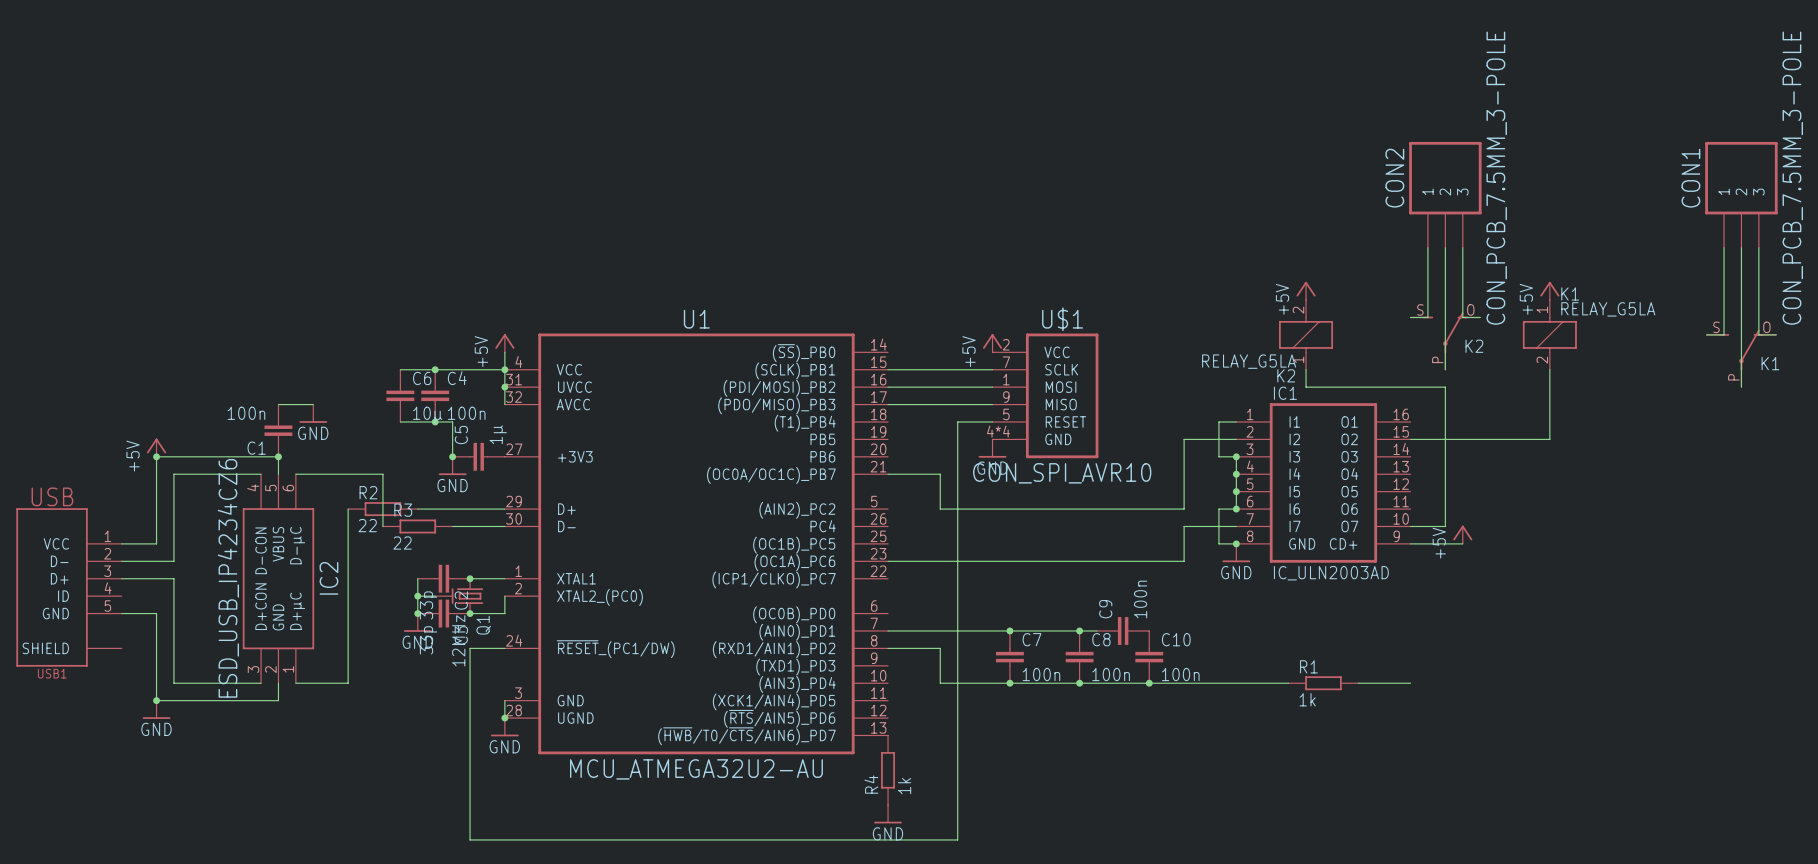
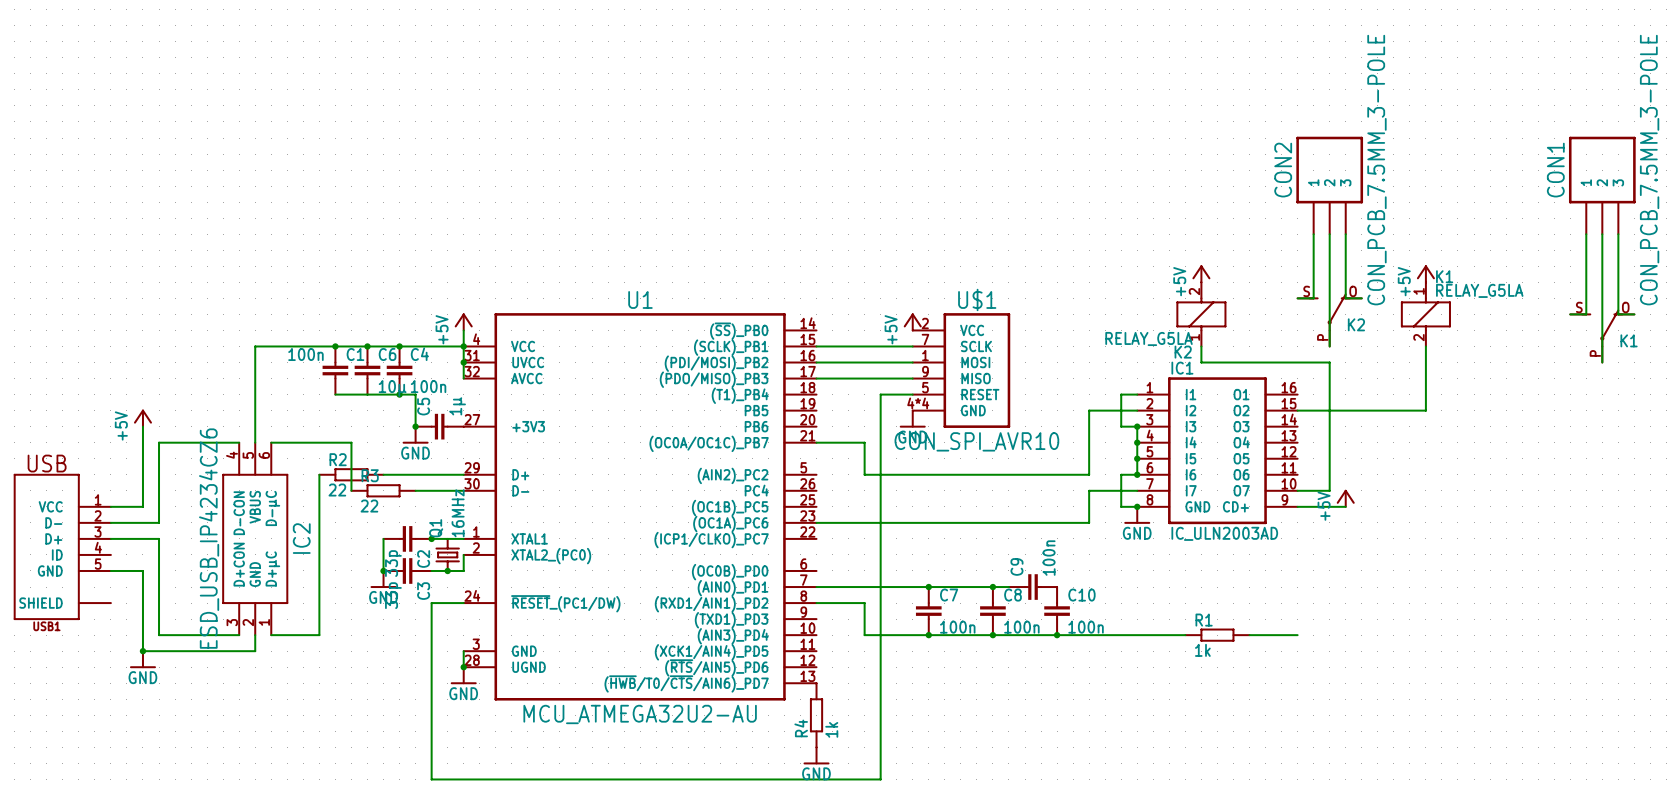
junction: none -> (335, 346)
junction: none -> (367, 346)
wire: (278, 404) (313, 404) -> (335, 394) (367, 394)
power symbol: GND (313, 413) -> none
C1 position: (278, 430) -> (335, 370)
C1 name position: C1 (256, 448) -> C1 (355, 354)
wire: (156, 456) (278, 456) -> (367, 346) (255, 346) (255, 426)
junction: (156, 456) -> none
junction: (278, 456) -> none
Q1 symbol: [435, 578, 484, 615] -> [435, 538, 460, 572]
wire: (417, 596) (435, 596) -> none
junction: (417, 596) -> none
junction position: (470, 613) -> (447, 570)
Q1 name position: Q1 (483, 625) -> Q1 (436, 528)
Q1 value: 12MHz (458, 640) -> 16MHz (458, 513)

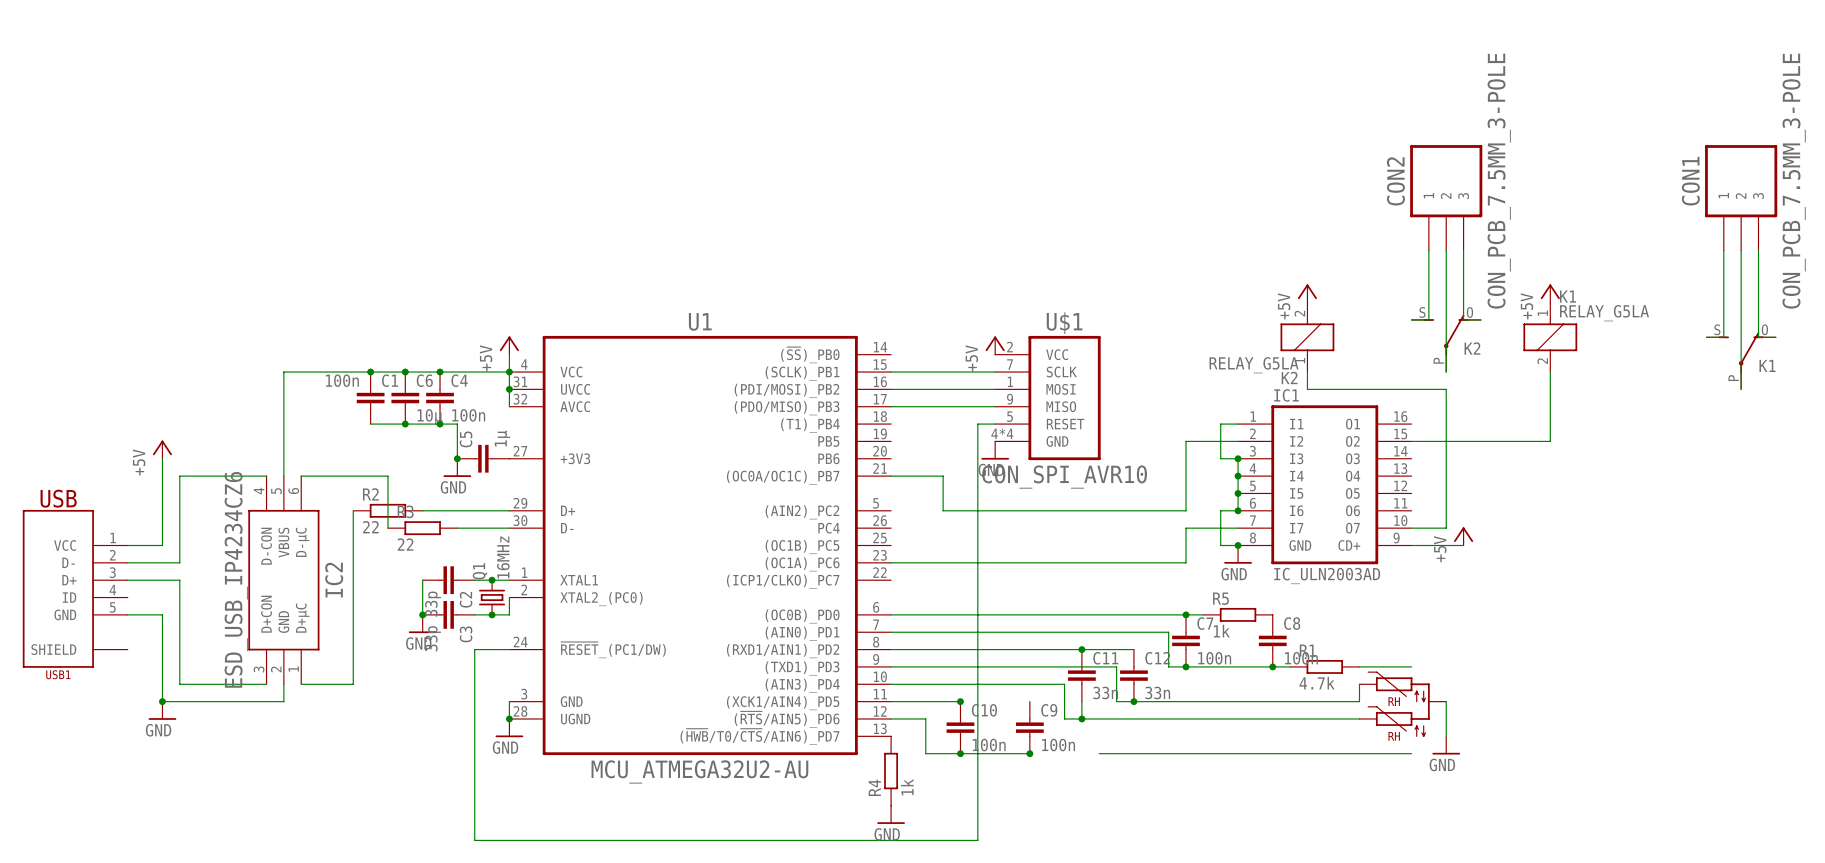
junction: none -> (405, 424)
wire: (896, 394) (880, 394) (880, 779) -> (977, 424) (977, 840) (960, 840)
junction position: (431, 538) -> (492, 580)
wire: none -> (891, 614) (1203, 614)
junction: none -> (1186, 614)
R5: none -> 1k (1238, 614)
junction: (928, 587) -> none
junction: (992, 587) -> none
wire: none -> (1099, 632) (1168, 632) (1168, 666) (1290, 666)
C9 rotation: 0° (1033, 587) -> 90° clockwise (1029, 727)
C9 position: (1033, 587) -> (1029, 727)
wire: (864, 603) (864, 635) -> (891, 684) (943, 684)
wire: none -> (943, 649) (1133, 649)
junction: none -> (1081, 649)
C7 position: (928, 611) -> (1186, 640)
C8 position: (992, 611) -> (1272, 640)
C10 position: (1057, 611) -> (960, 727)
junction: none -> (1186, 666)
junction: none -> (1272, 666)
wire: none -> (1359, 666) (1411, 666)
C11: none -> 33n (1081, 675)
C12: none -> 33n (1133, 675)
junction: (928, 635) -> none
wire: (976, 635) (1185, 635) -> (1064, 684) (1064, 718) (1359, 718)
junction: (992, 635) -> none
junction: (1057, 635) -> none
R1 position: (1217, 635) -> (1324, 666)
wire: (1249, 635) (1297, 635) -> (1359, 684) (1359, 701) (1116, 701) (1116, 666) (891, 666)
R1 value: 1k (1202, 650) -> 4.7k (1317, 683)
wire: none -> (891, 701) (960, 701)
junction: none -> (960, 701)
wire: none -> (1081, 701) (1081, 718)
junction: none -> (1133, 701)
wire: none -> (1446, 701) (1446, 736)
part: none -> (1402, 704)
wire: none -> (891, 718) (925, 718) (925, 753) (1029, 753)
junction: none -> (1081, 718)
power symbol: none -> GND (1446, 745)
junction: none -> (960, 753)
junction: none -> (1029, 753)
wire: none -> (1099, 753) (1411, 753)

